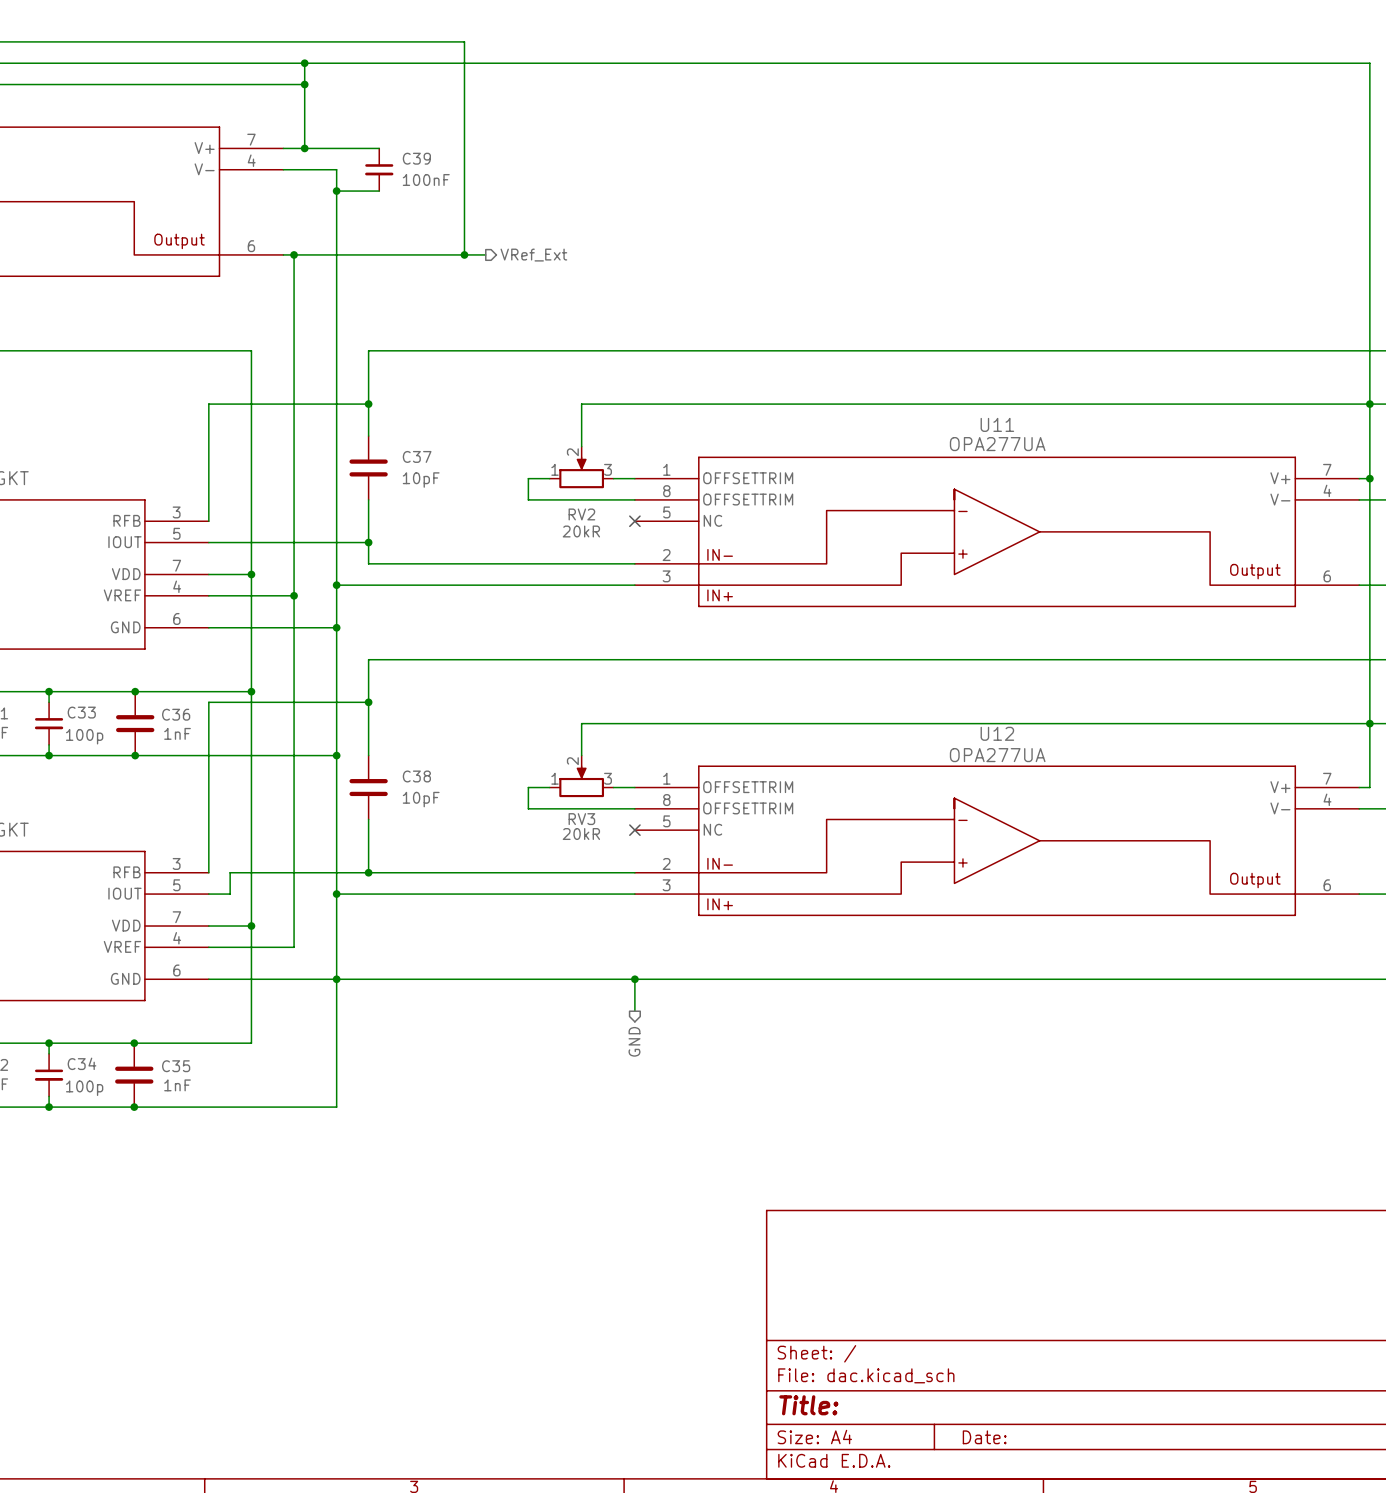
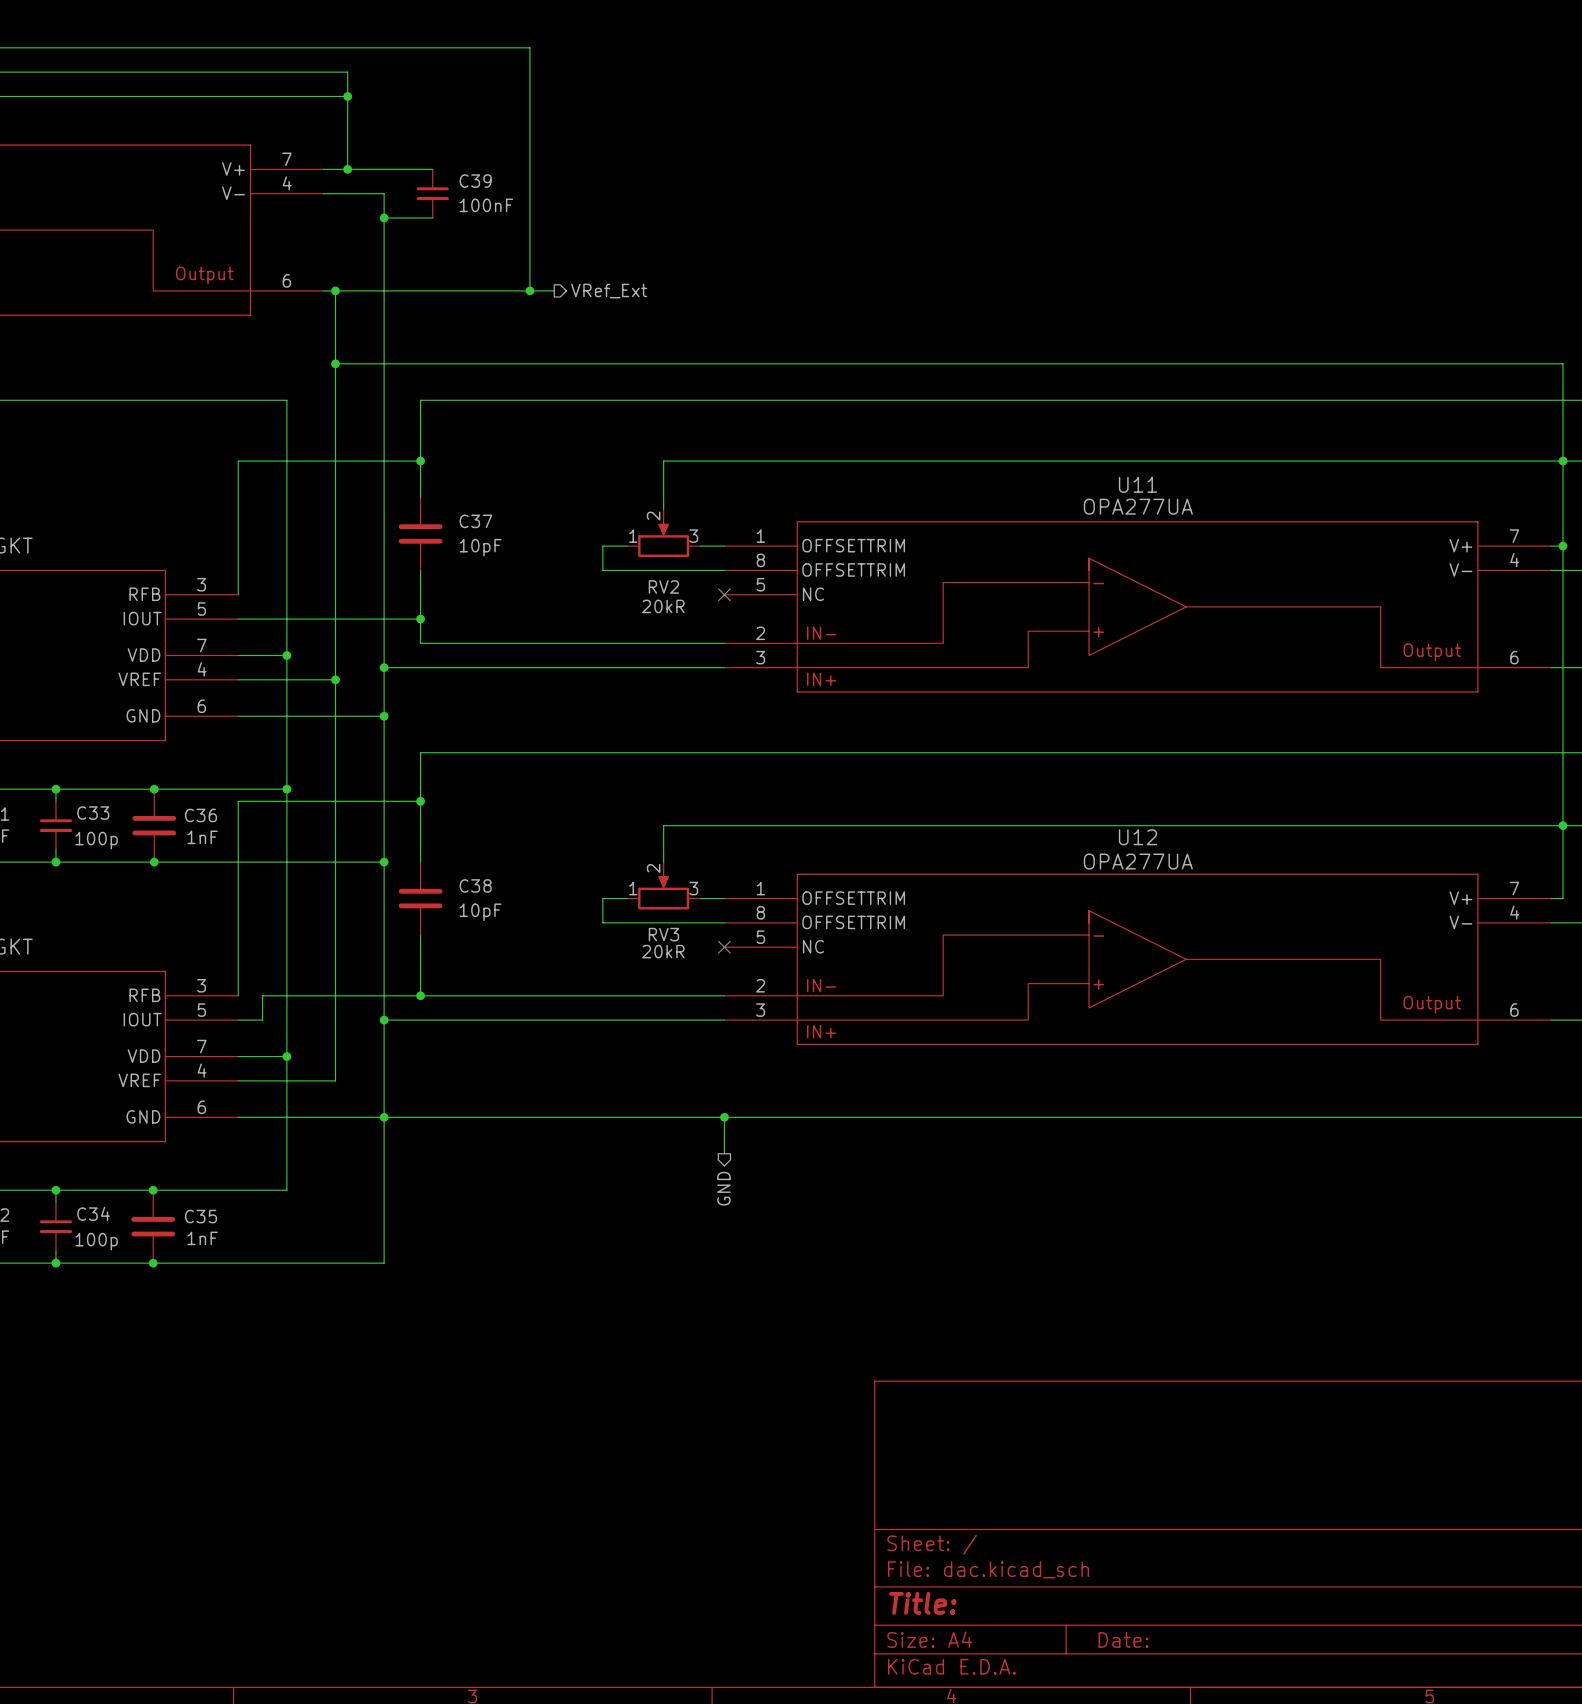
wire: (304, 63) (1369, 63) (1369, 318) -> (335, 363) (1562, 363)
junction: (304, 63) -> none
junction: none -> (335, 363)

